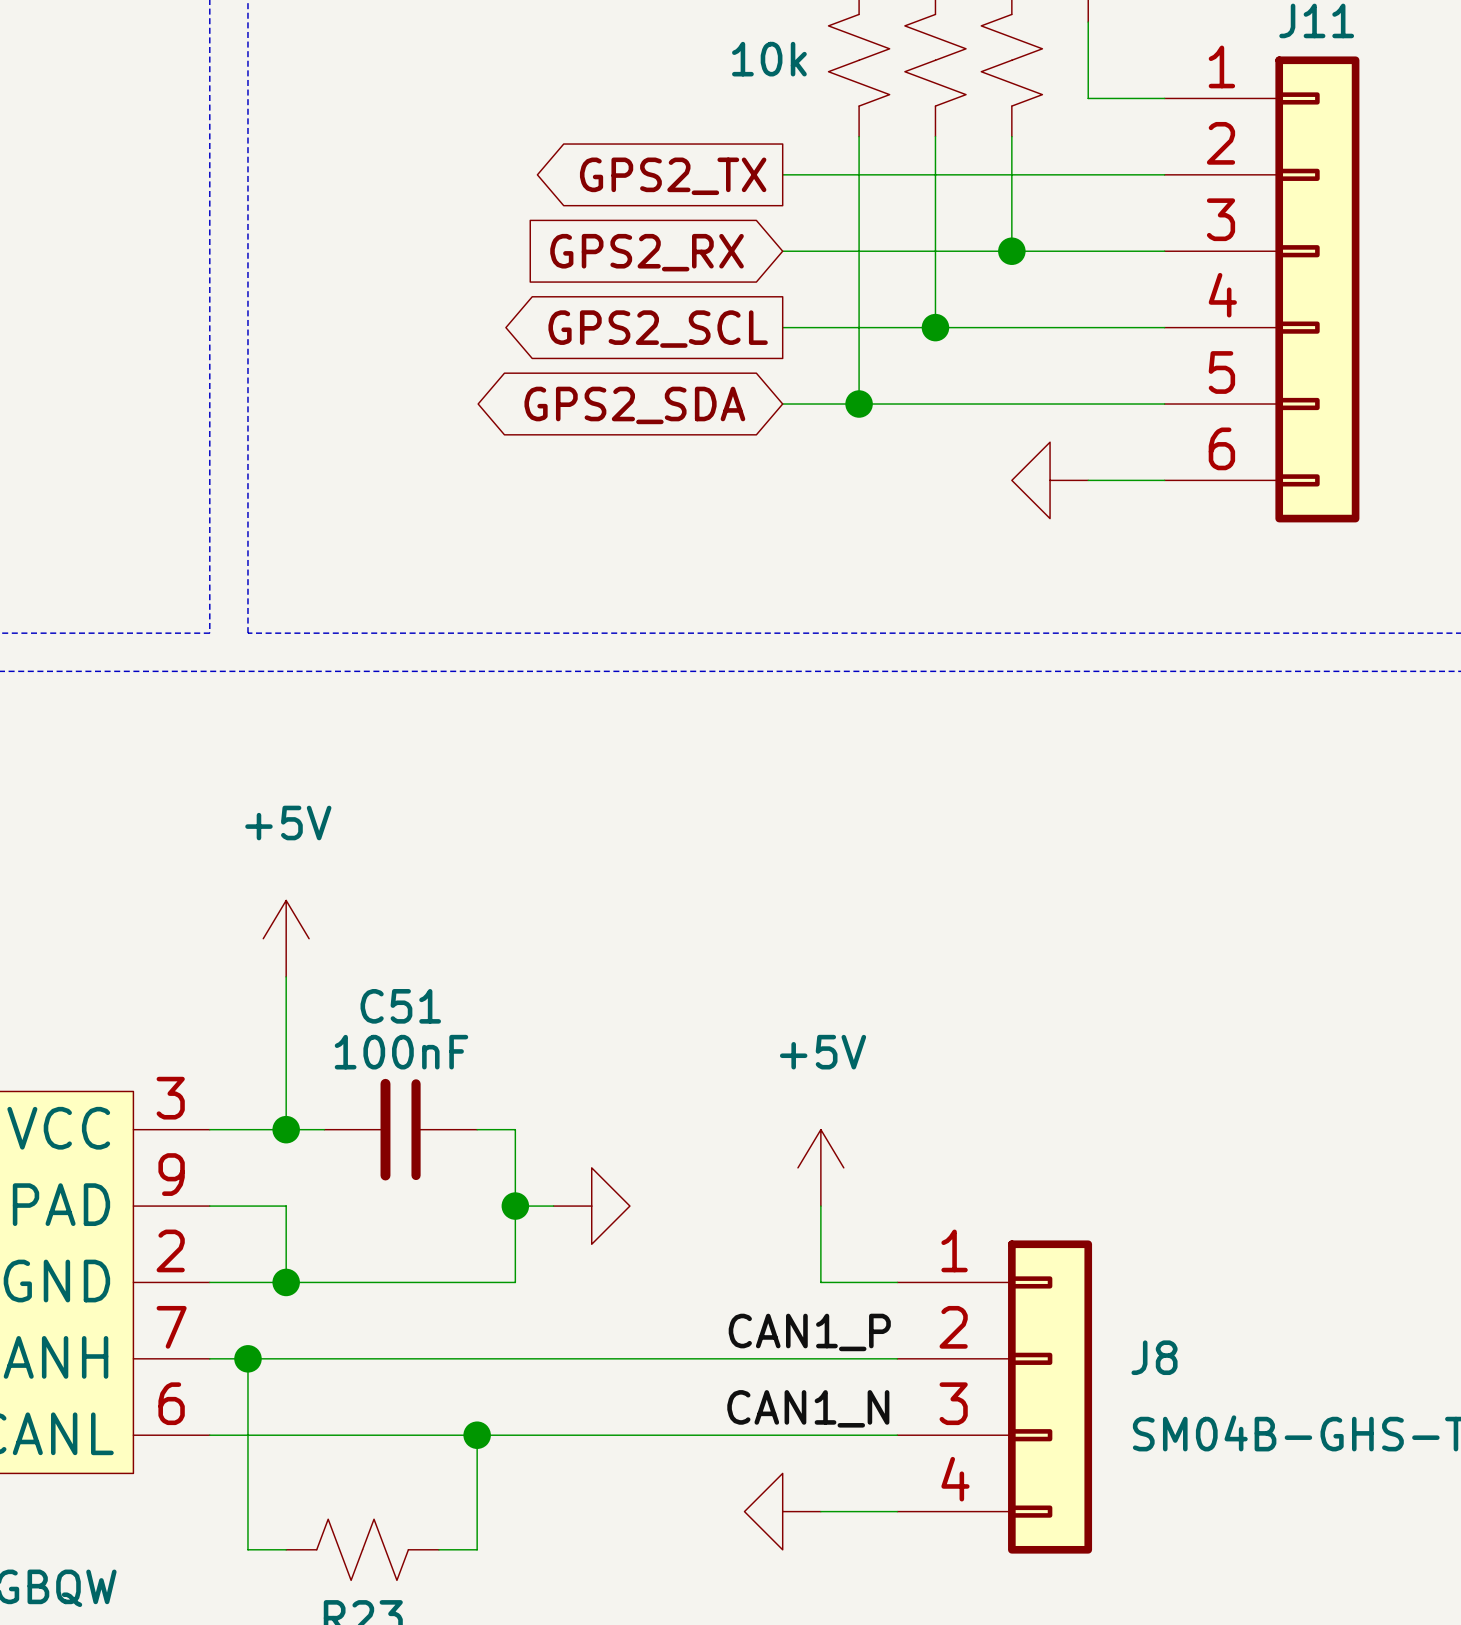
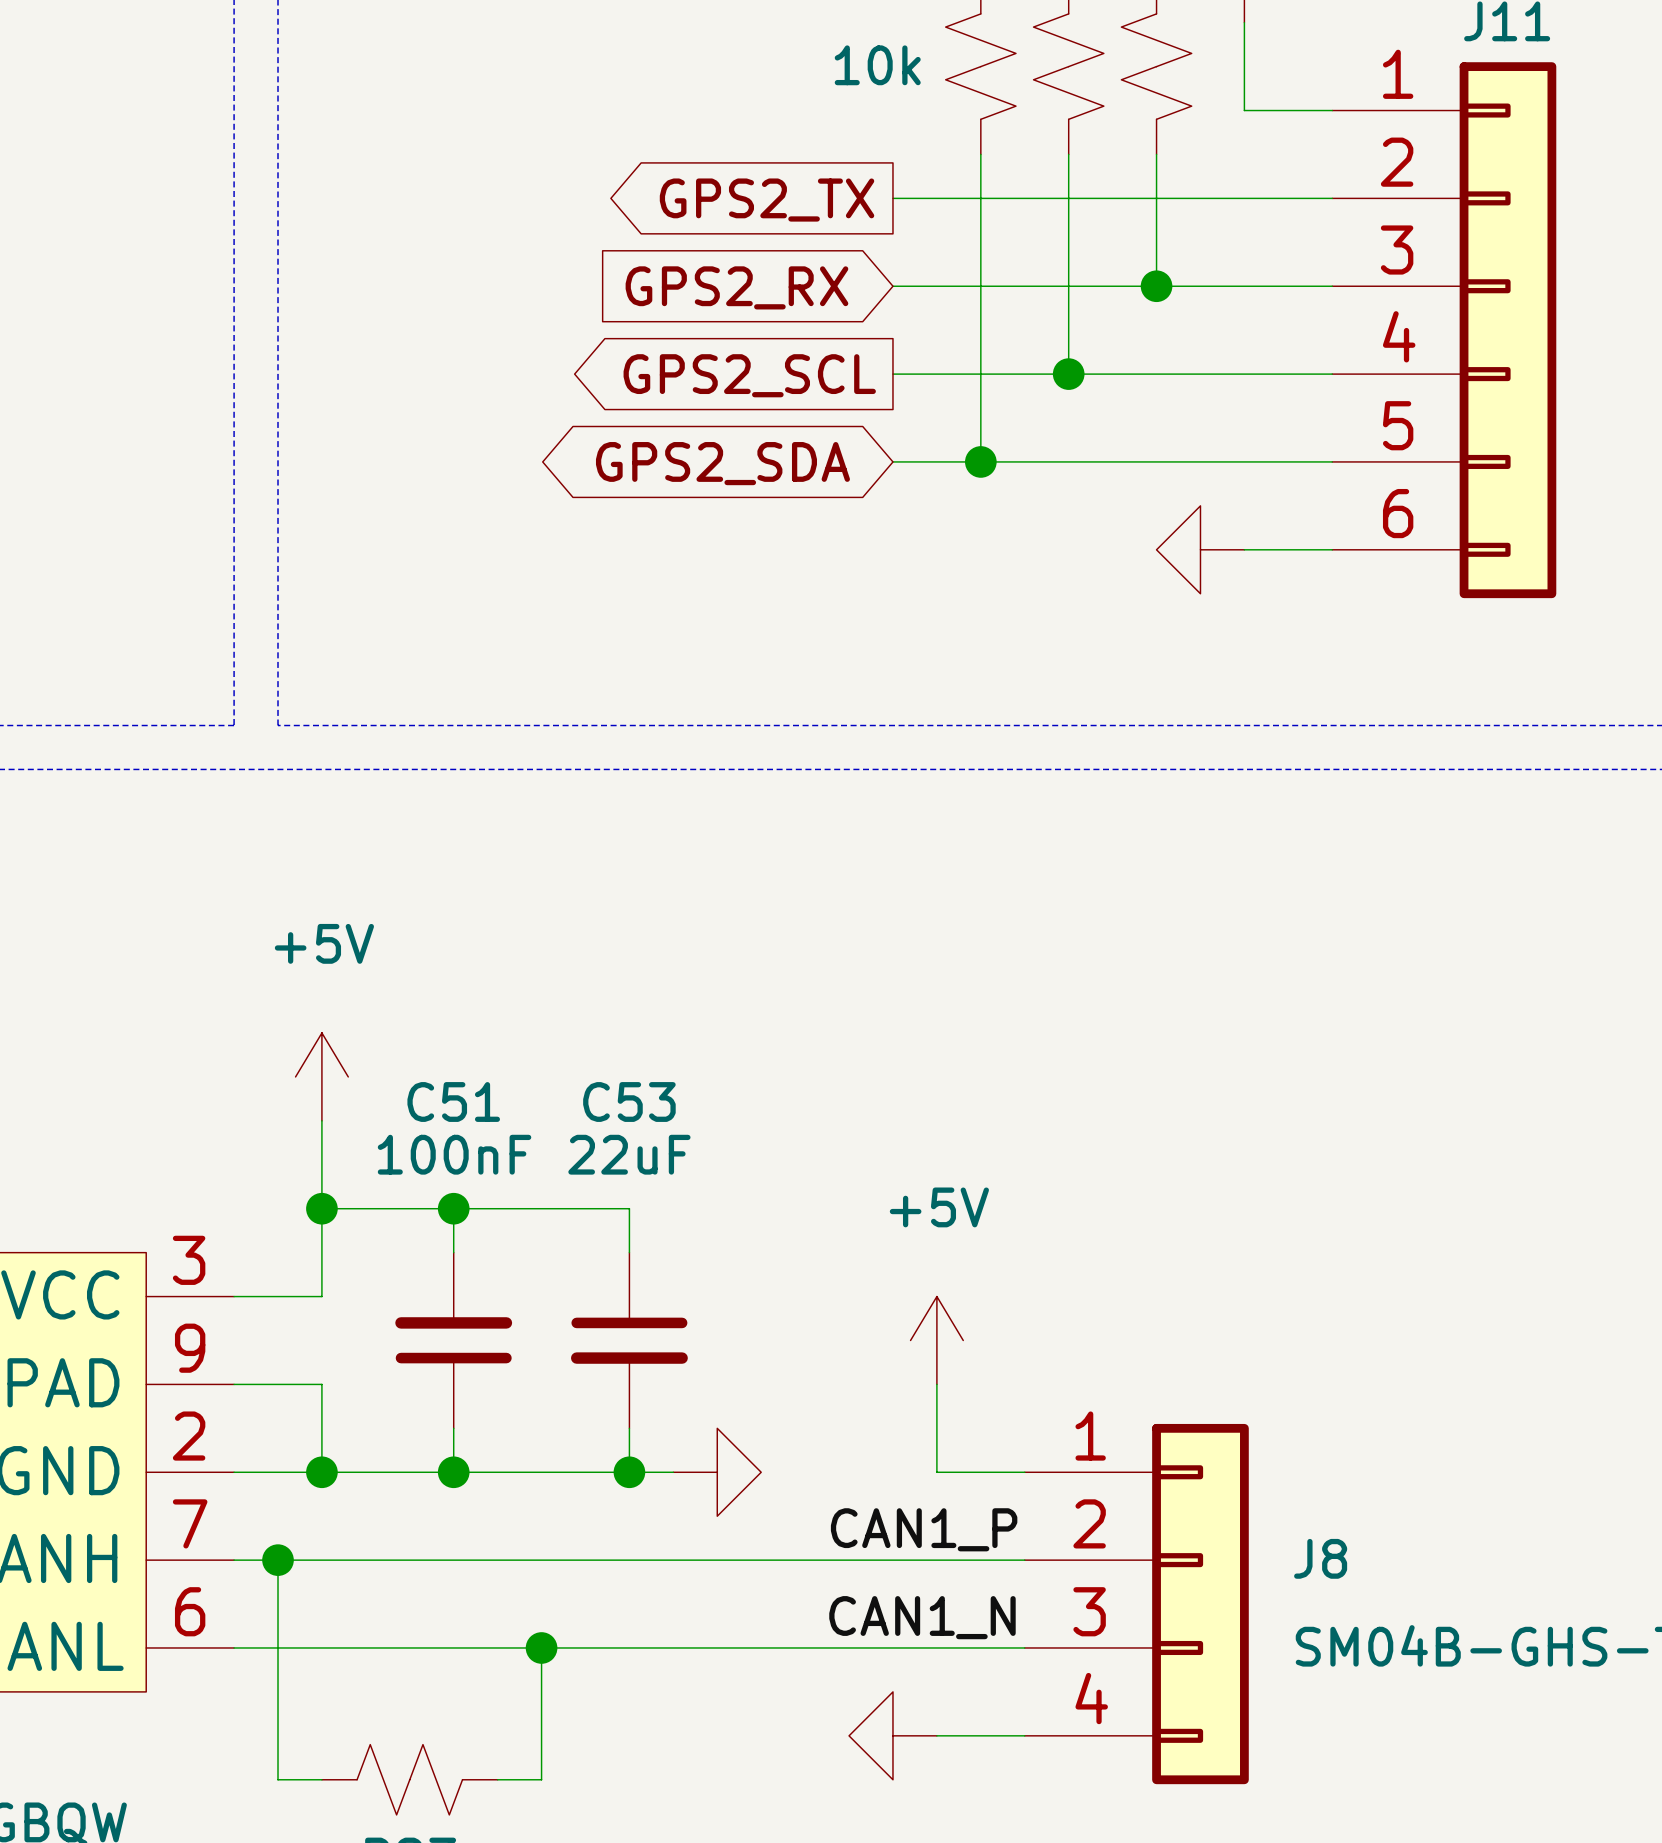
C51 name position: C51 (400, 1006) -> C51 (453, 1101)
C51 value position: 100nF (401, 1052) -> 100nF (454, 1154)
wire: none -> (321, 1208) (629, 1208) (629, 1252)
junction: none -> (321, 1208)
wire: none -> (453, 1208) (453, 1252)
junction: none -> (453, 1208)
wire: (286, 1129) (324, 1129) -> none
junction: (286, 1129) -> none
C51 rotation: 0° (400, 1129) -> 90° clockwise (453, 1340)
wire: (477, 1129) (515, 1129) (515, 1282) -> (673, 1472) (585, 1472)
C53: none -> 22uF (629, 1340)
wire: (515, 1206) (553, 1206) -> none
junction: (515, 1206) -> none
power symbol position: (591, 1206) -> (717, 1472)
wire: none -> (453, 1428) (453, 1472)
wire: none -> (629, 1428) (629, 1472)
junction: none -> (453, 1472)
junction: none -> (629, 1472)

